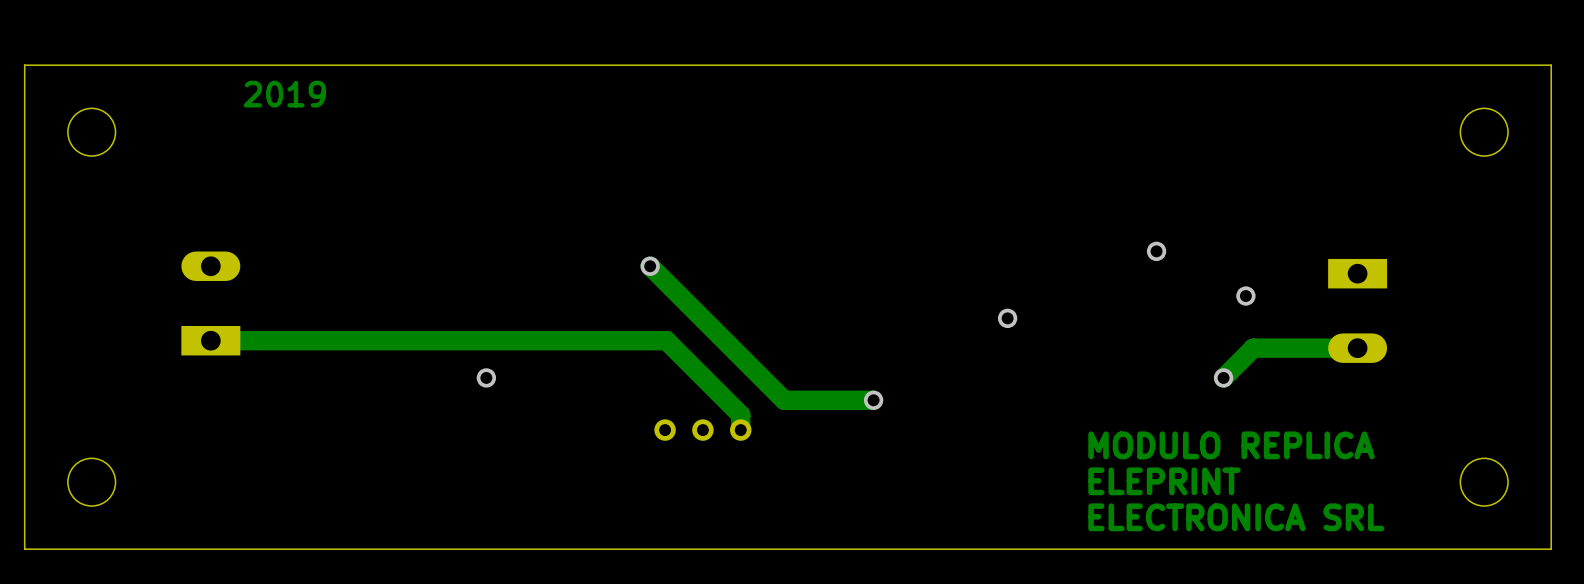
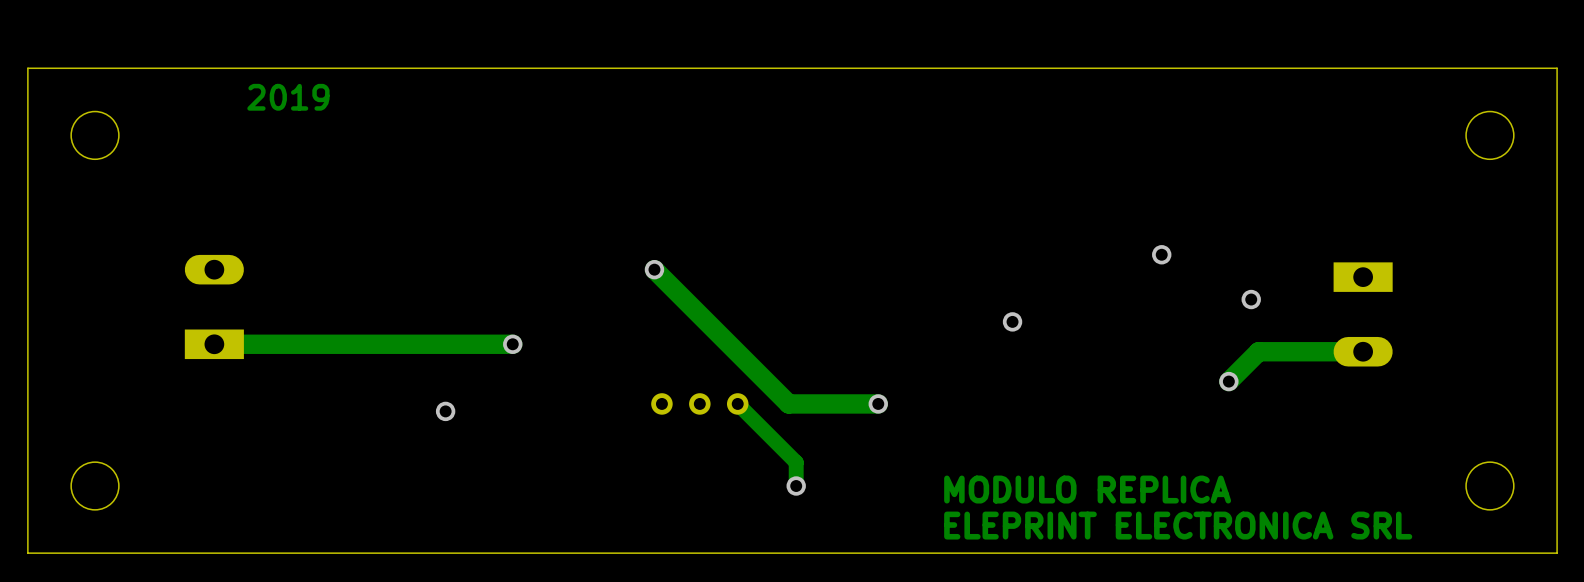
track: (508, 340) (666, 340) (740, 414) (740, 430) -> none
via: none -> (512, 344)
via: (486, 377) -> none
track: none -> (737, 403) (796, 462) (796, 486)
via: none -> (445, 411)
part position: (702, 430) -> (699, 403)
text position: MODULO REPLICA (1231, 445) -> MODULO REPLICA (1087, 489)
text: ELEPRINT (1164, 481) -> none
via: none -> (796, 486)
text: ELECTRONICA SRL (1236, 517) -> ELEPRINT ELECTRONICA SRL (1178, 525)

